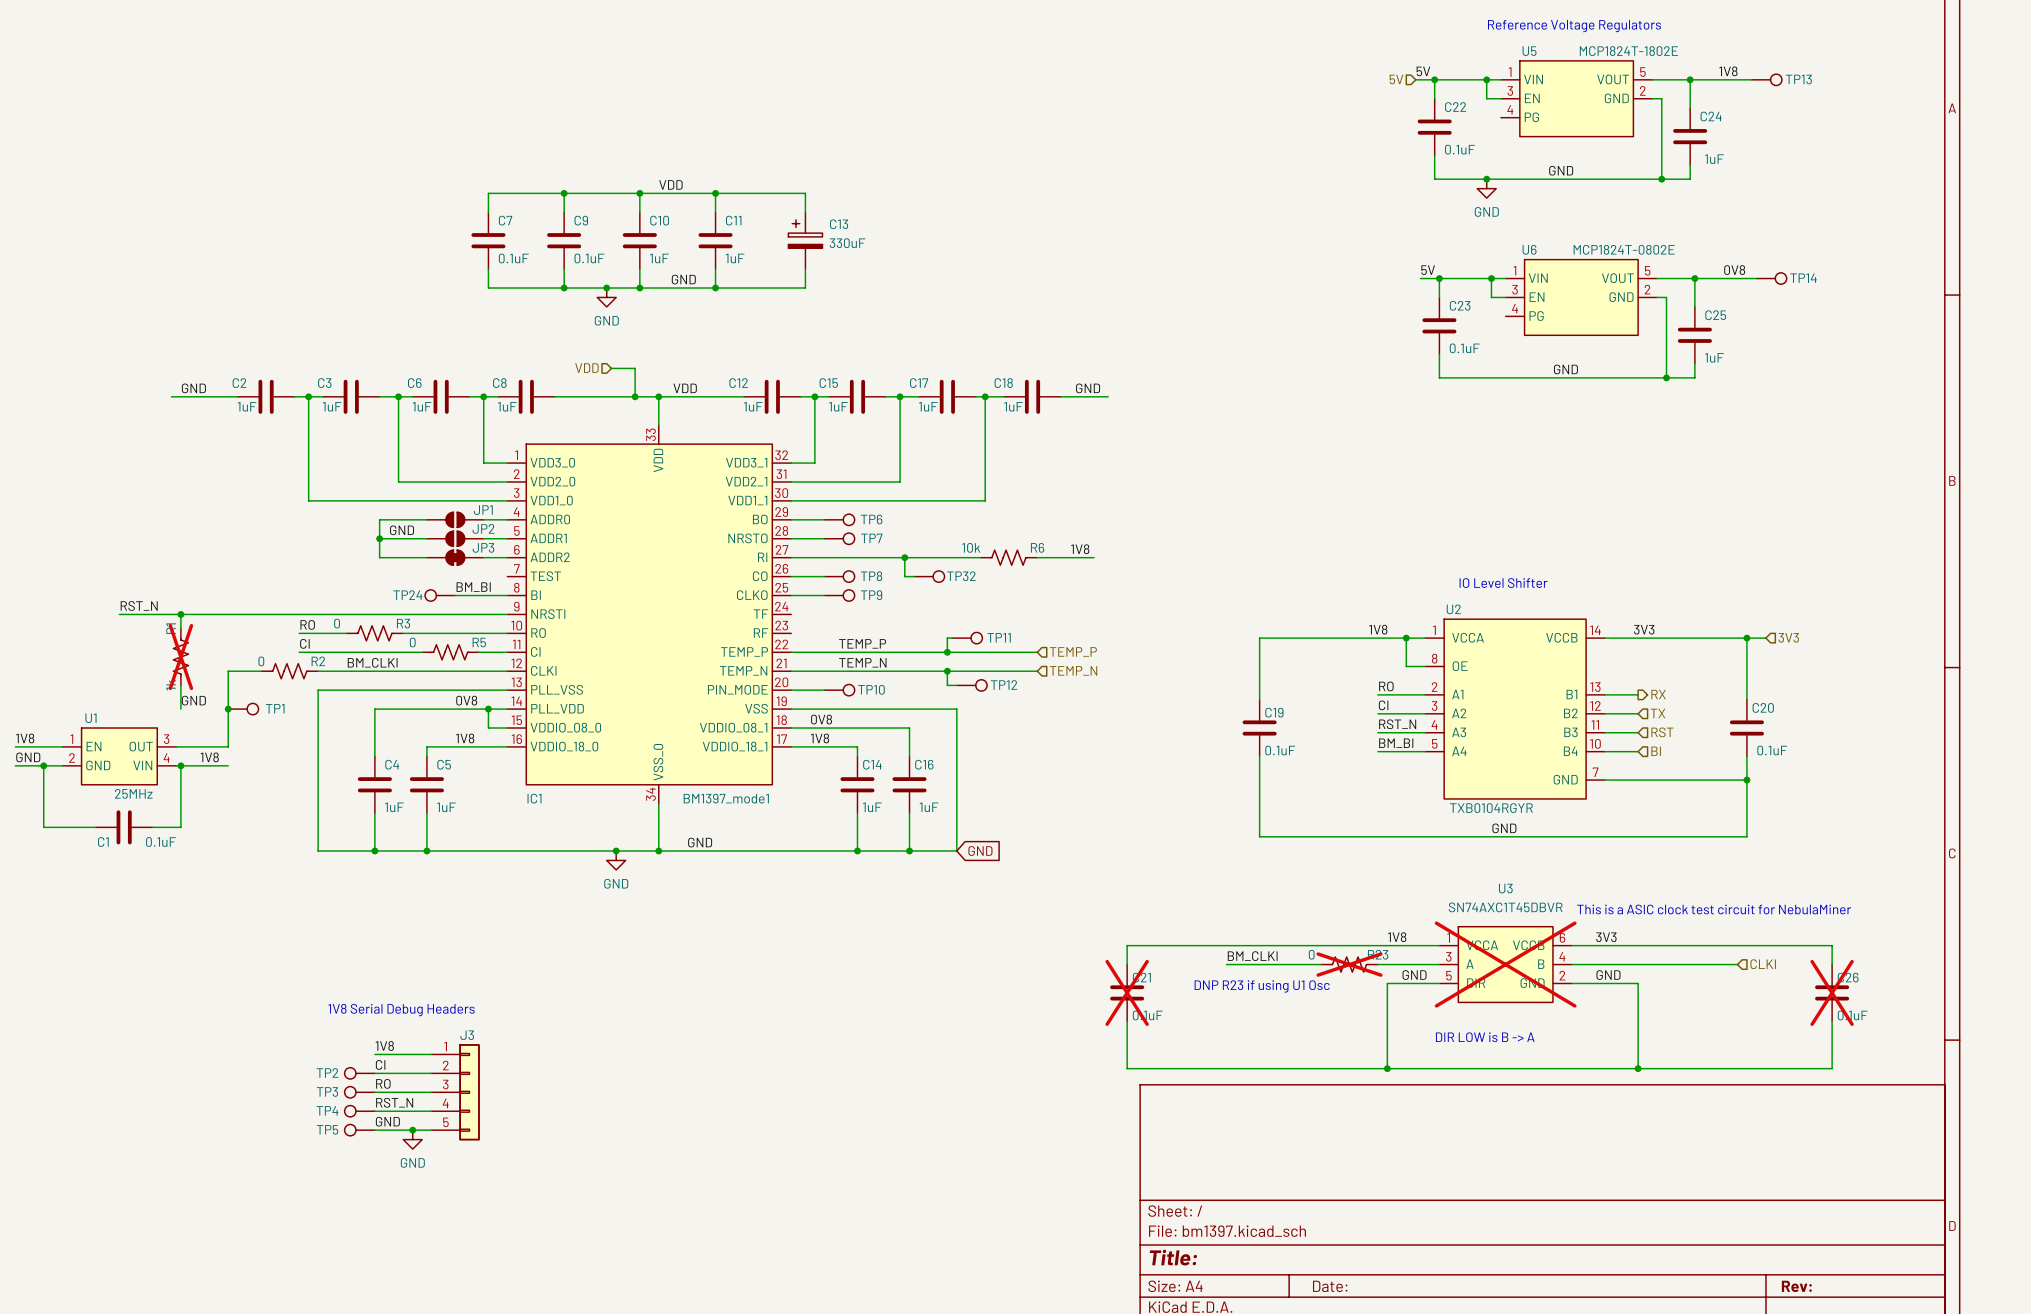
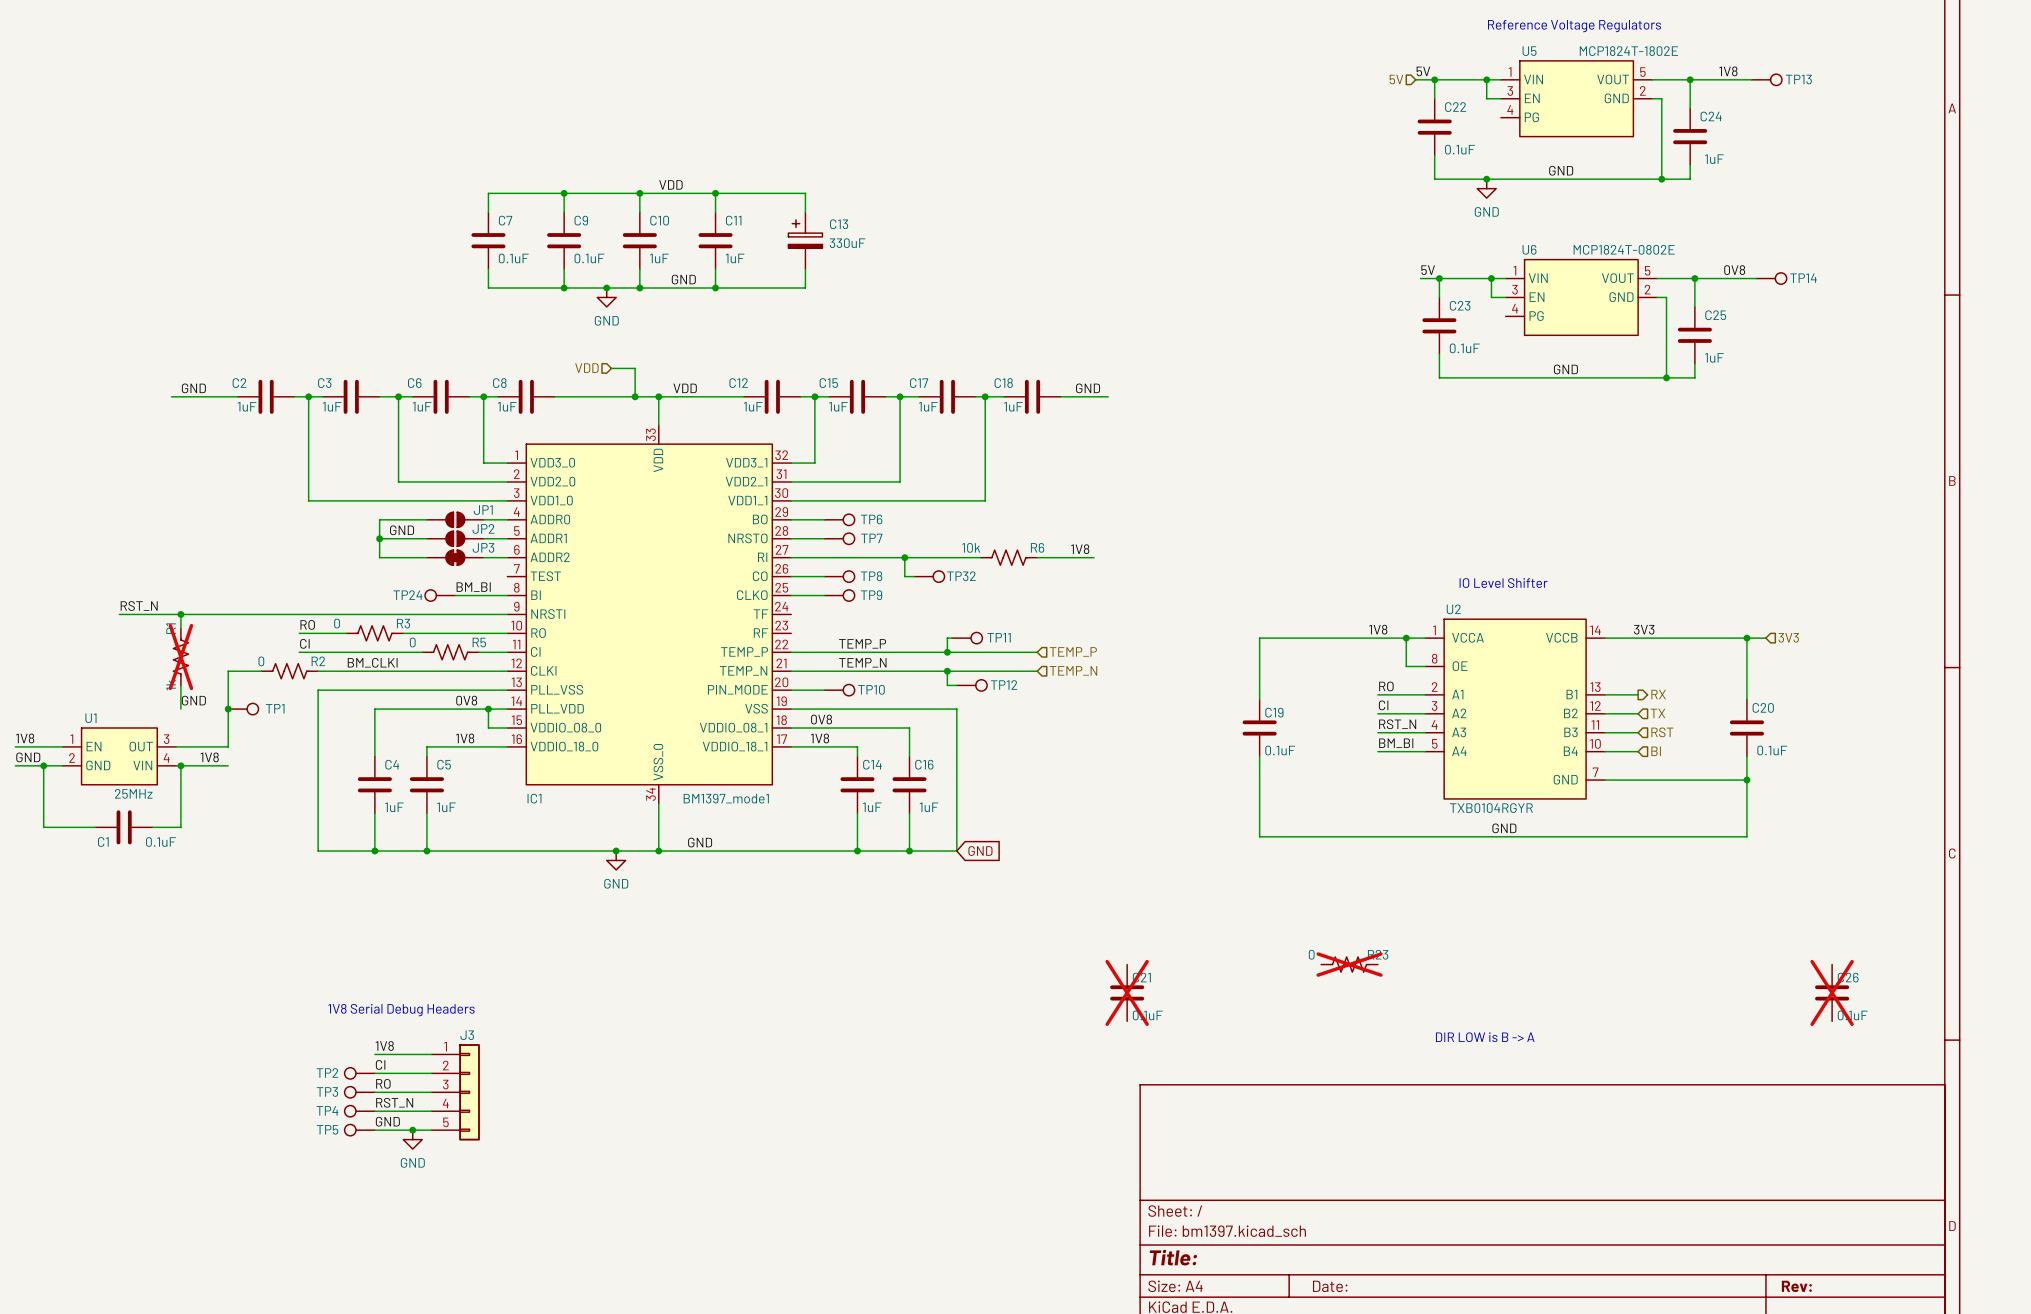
text: This is a ASIC clock test circuit for NebulaMiner (1714, 909) -> none
label: 1V8 (1397, 937) -> none
label: 3V3 (1606, 937) -> none
wire: (1439, 945) (1127, 945) (1127, 964) -> none
wire: (1571, 945) (1832, 945) (1832, 964) -> none
label: BM_CLKI (1252, 956) -> none
wire: (1226, 964) (1321, 964) -> none
wire: (1377, 964) (1439, 964) -> none
U3: SN74AXC1T45DBVR (1505, 964) -> none
wire: (1571, 964) (1737, 964) -> none
hierarchical label: CLKI (1763, 964) -> none
label: GND (1414, 975) -> none
label: GND (1608, 975) -> none
wire: (1439, 983) (1387, 983) (1387, 1068) -> none
wire: (1571, 983) (1638, 983) (1638, 1068) -> none
text: DNP R23 if using U1 Osc (1262, 986) -> none
wire: (1127, 1021) (1127, 1068) (1832, 1068) (1832, 1021) -> none
junction: (1387, 1068) -> none
junction: (1638, 1068) -> none

